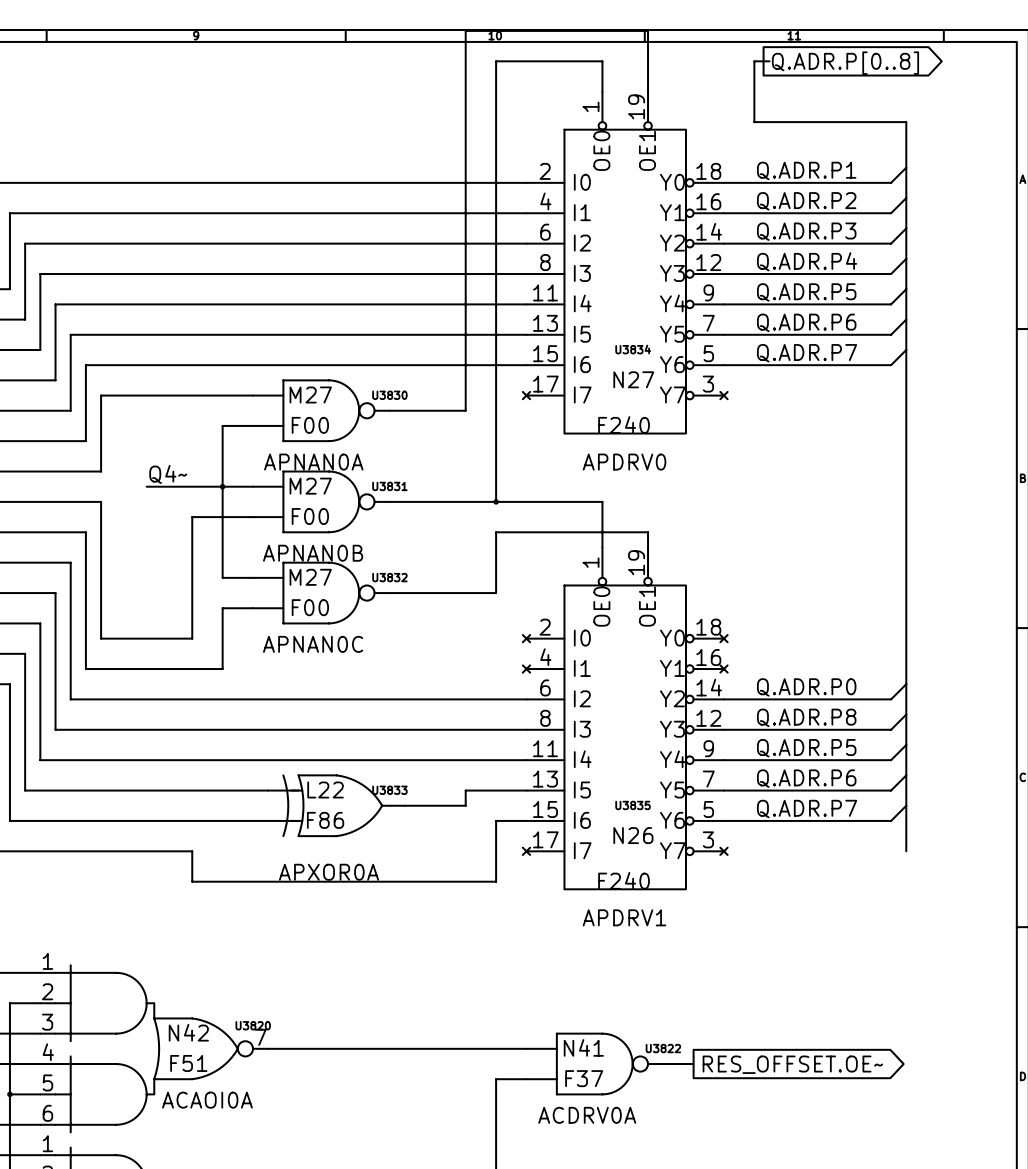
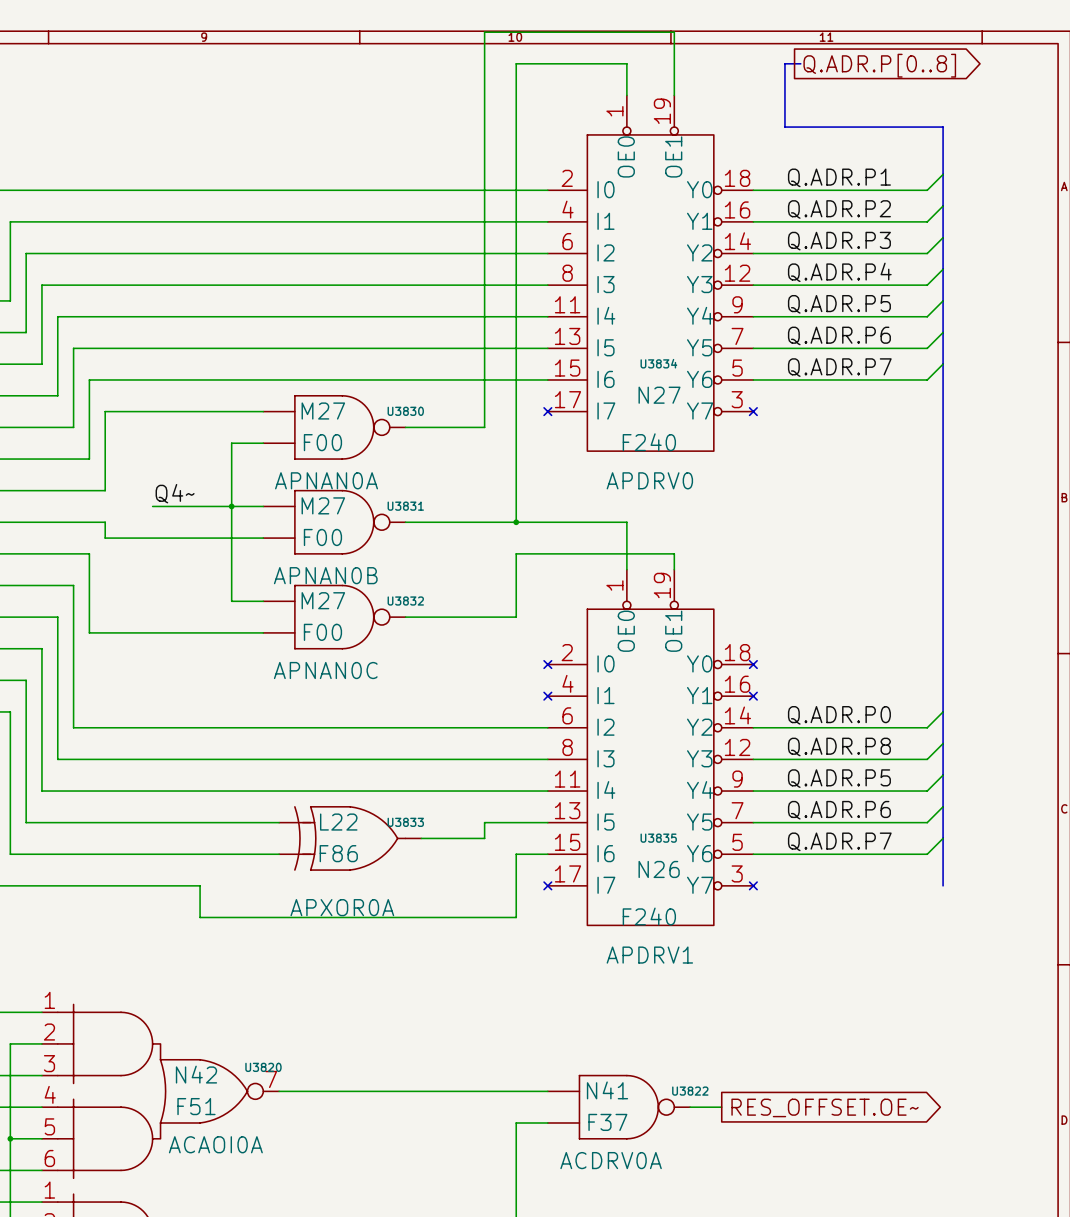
wire: (101, 517) (101, 638) (192, 638) (192, 517) -> (105, 538) (200, 538)
wire: (85, 608) (85, 669) (222, 669) (222, 608) -> (89, 632) (231, 632)

